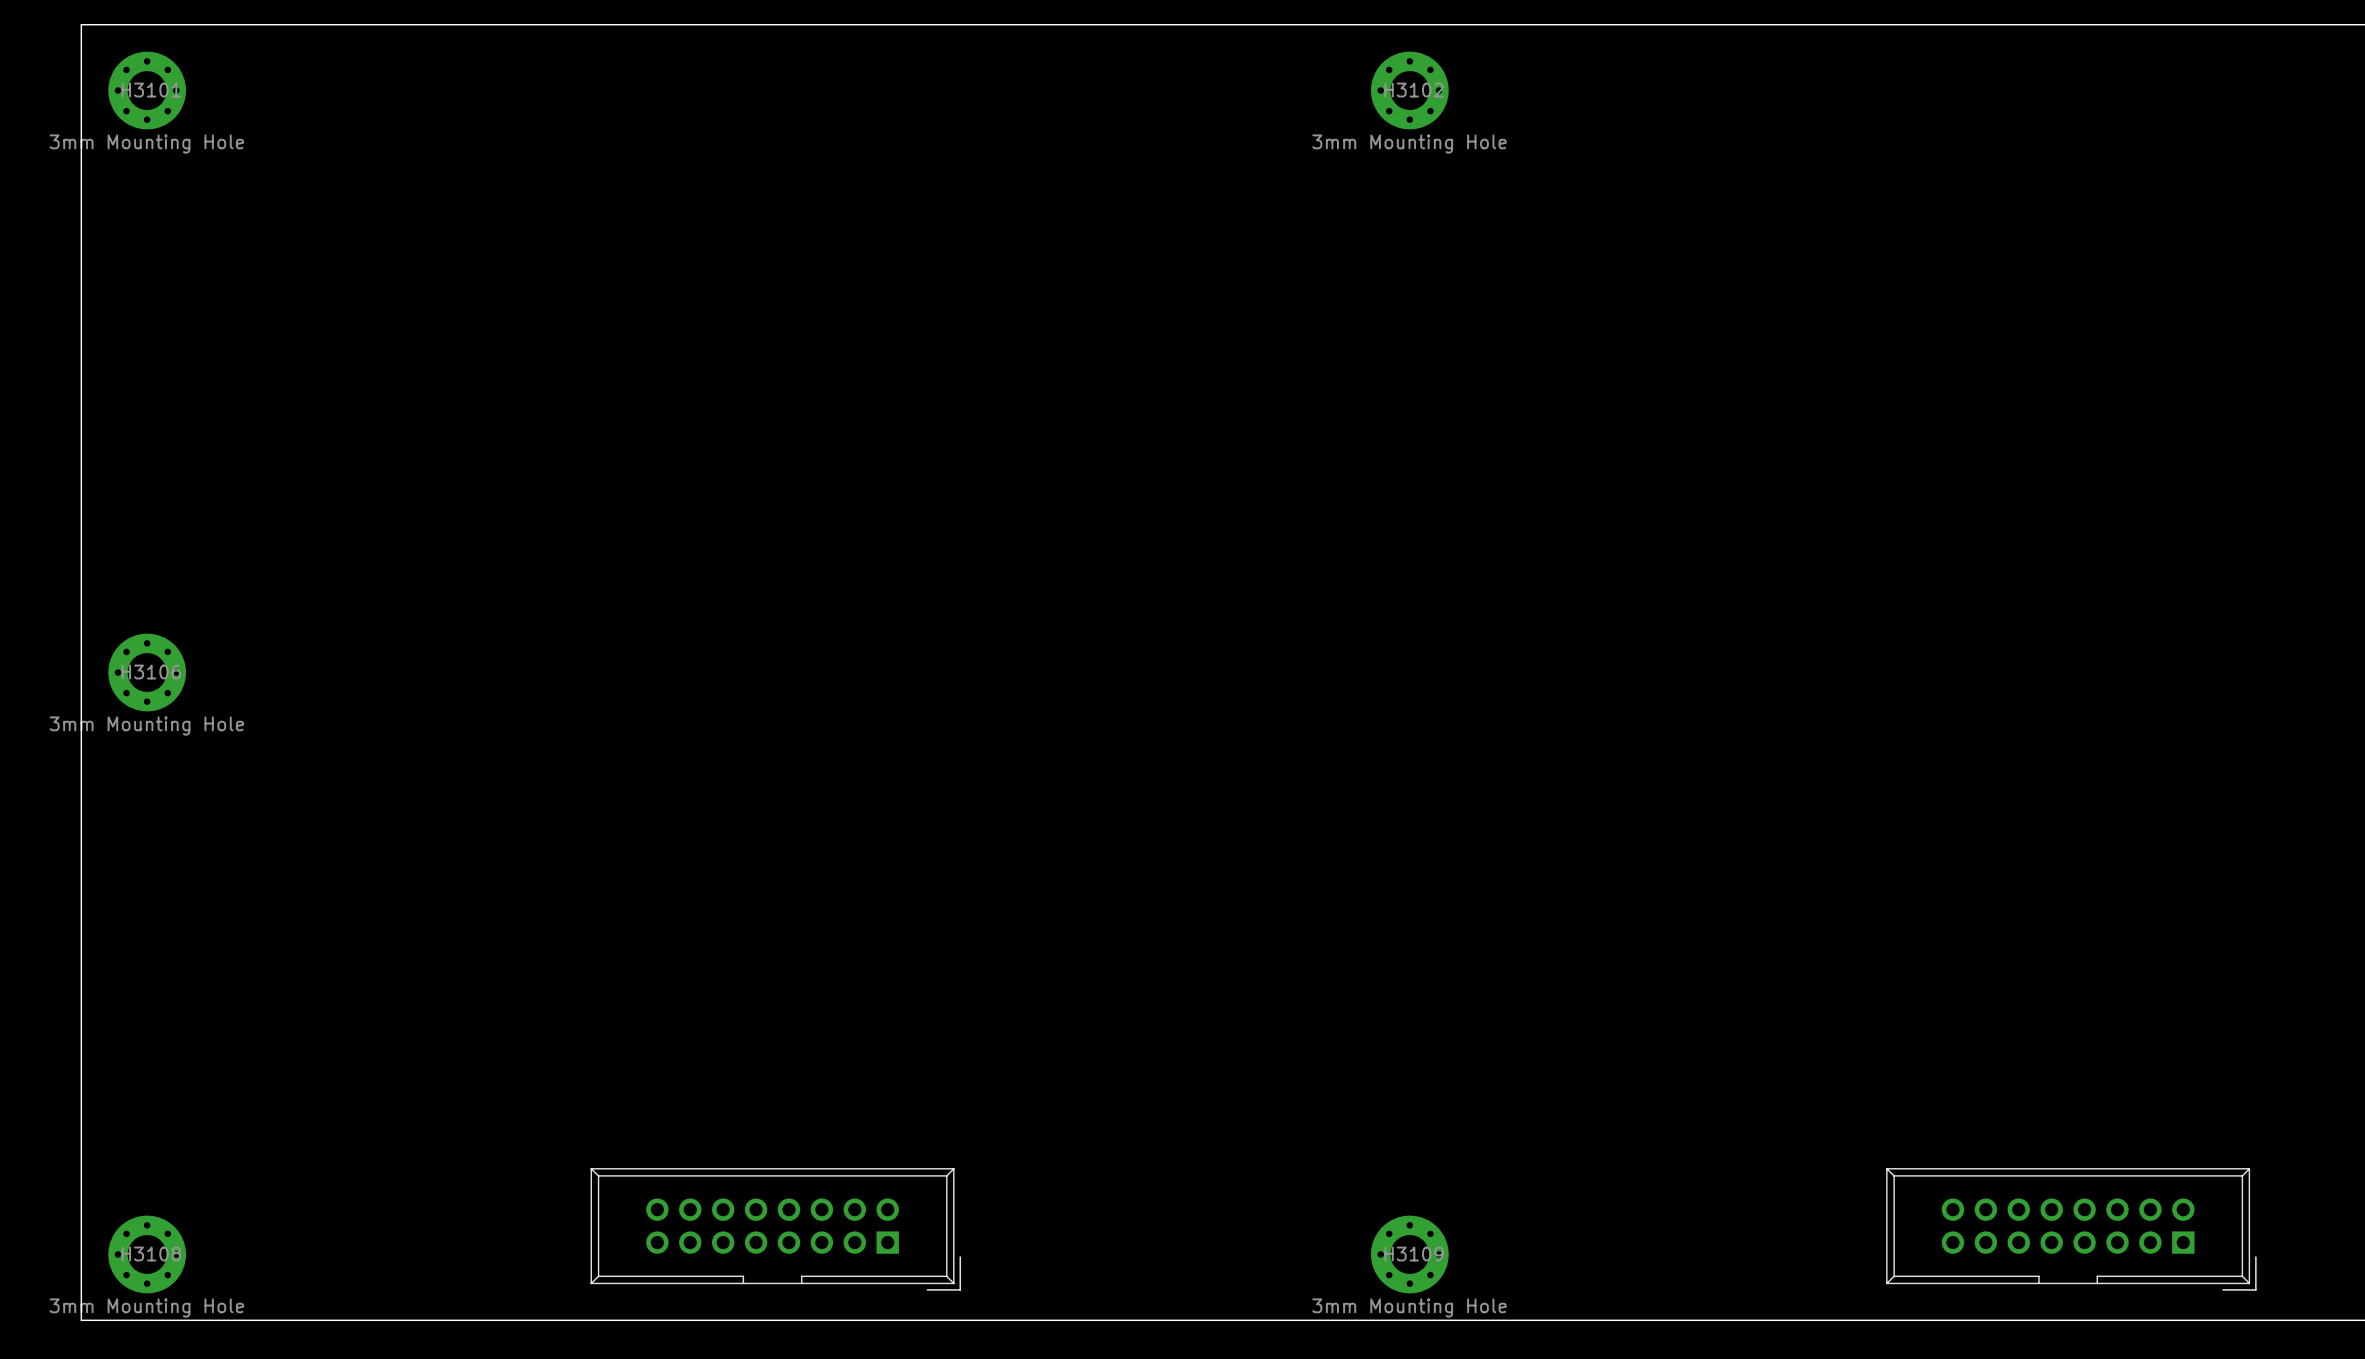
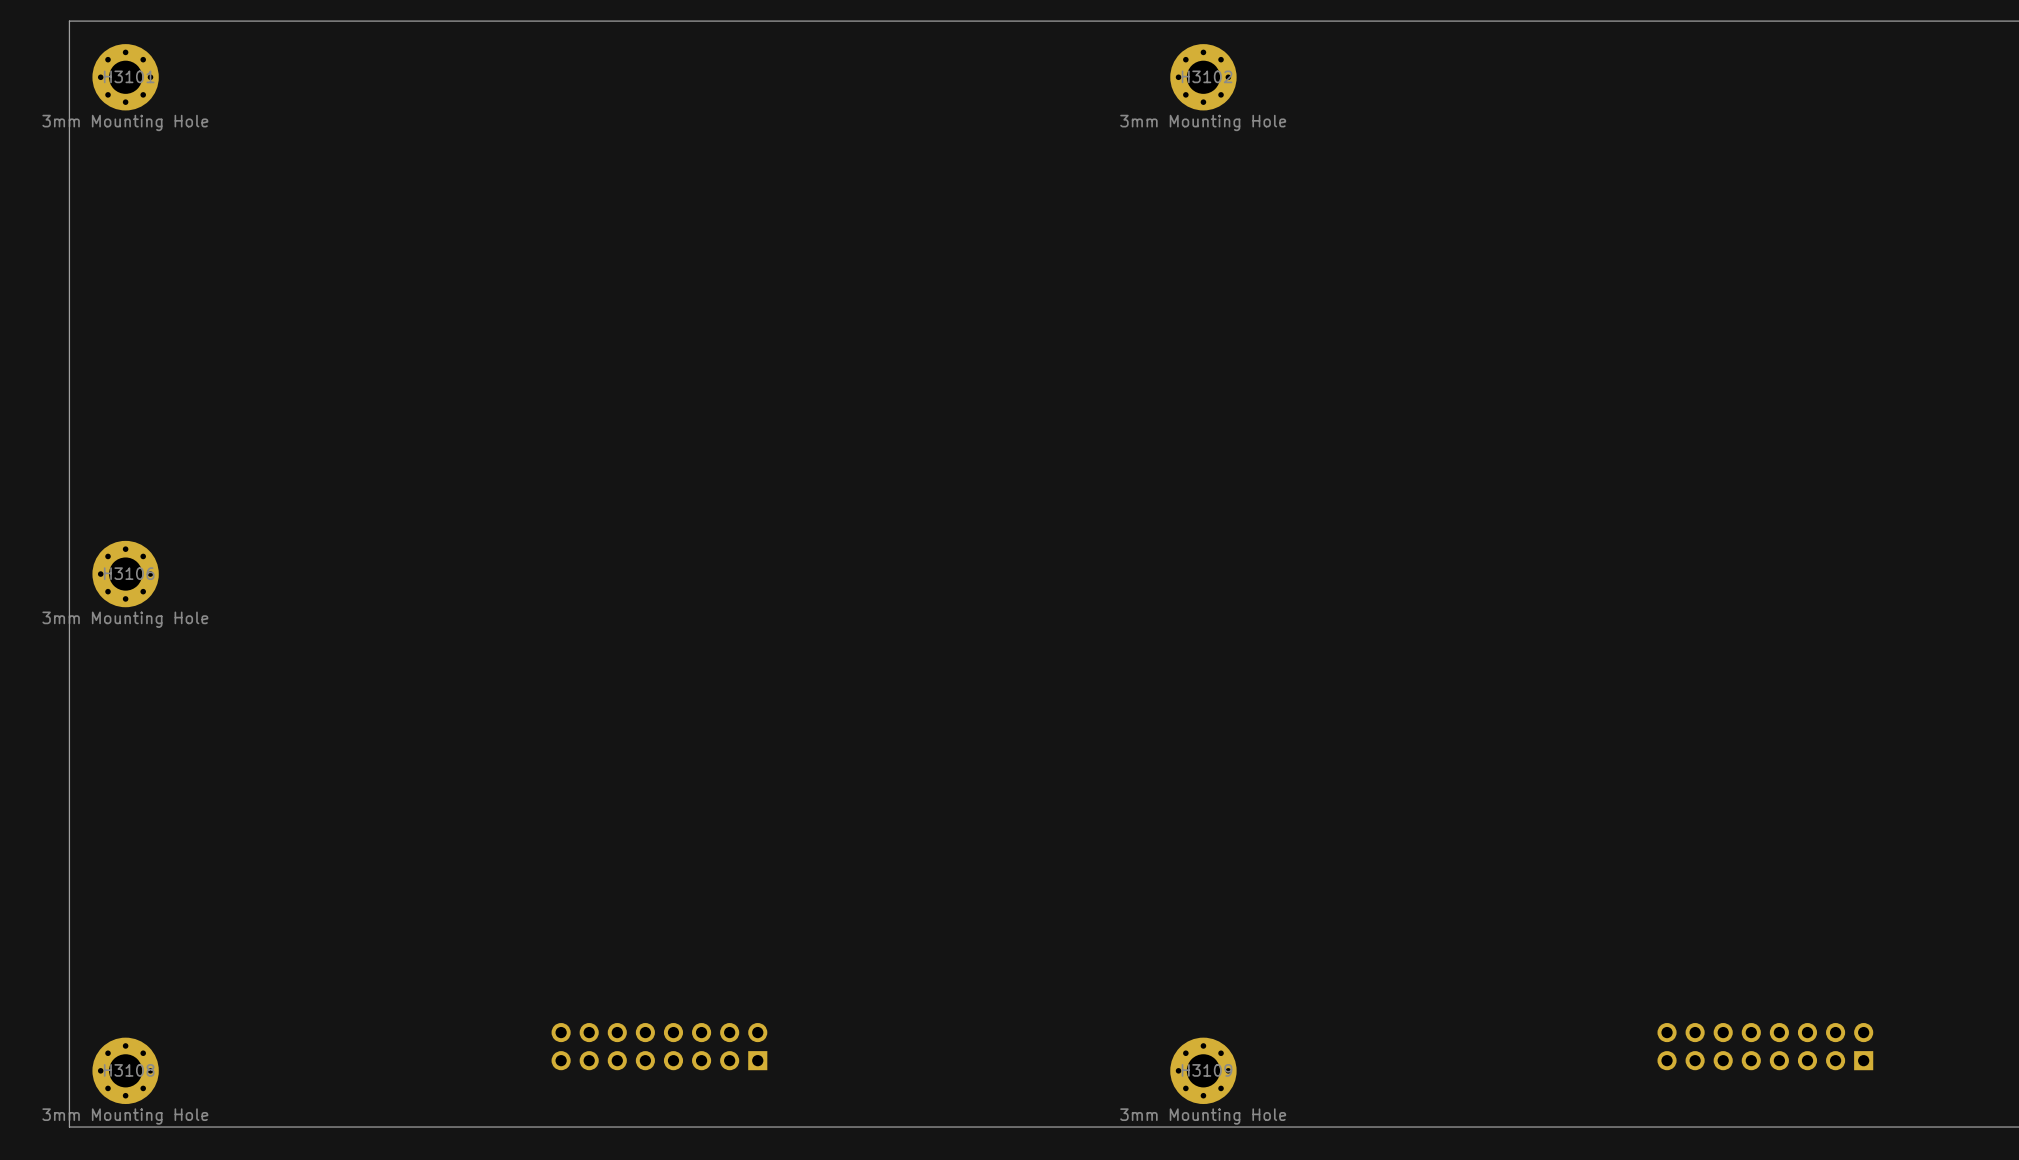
part footprint: [590, 1168, 962, 1291] -> [551, 1023, 768, 1071]
part footprint: [1886, 1168, 2257, 1291] -> [1657, 1023, 1874, 1071]

